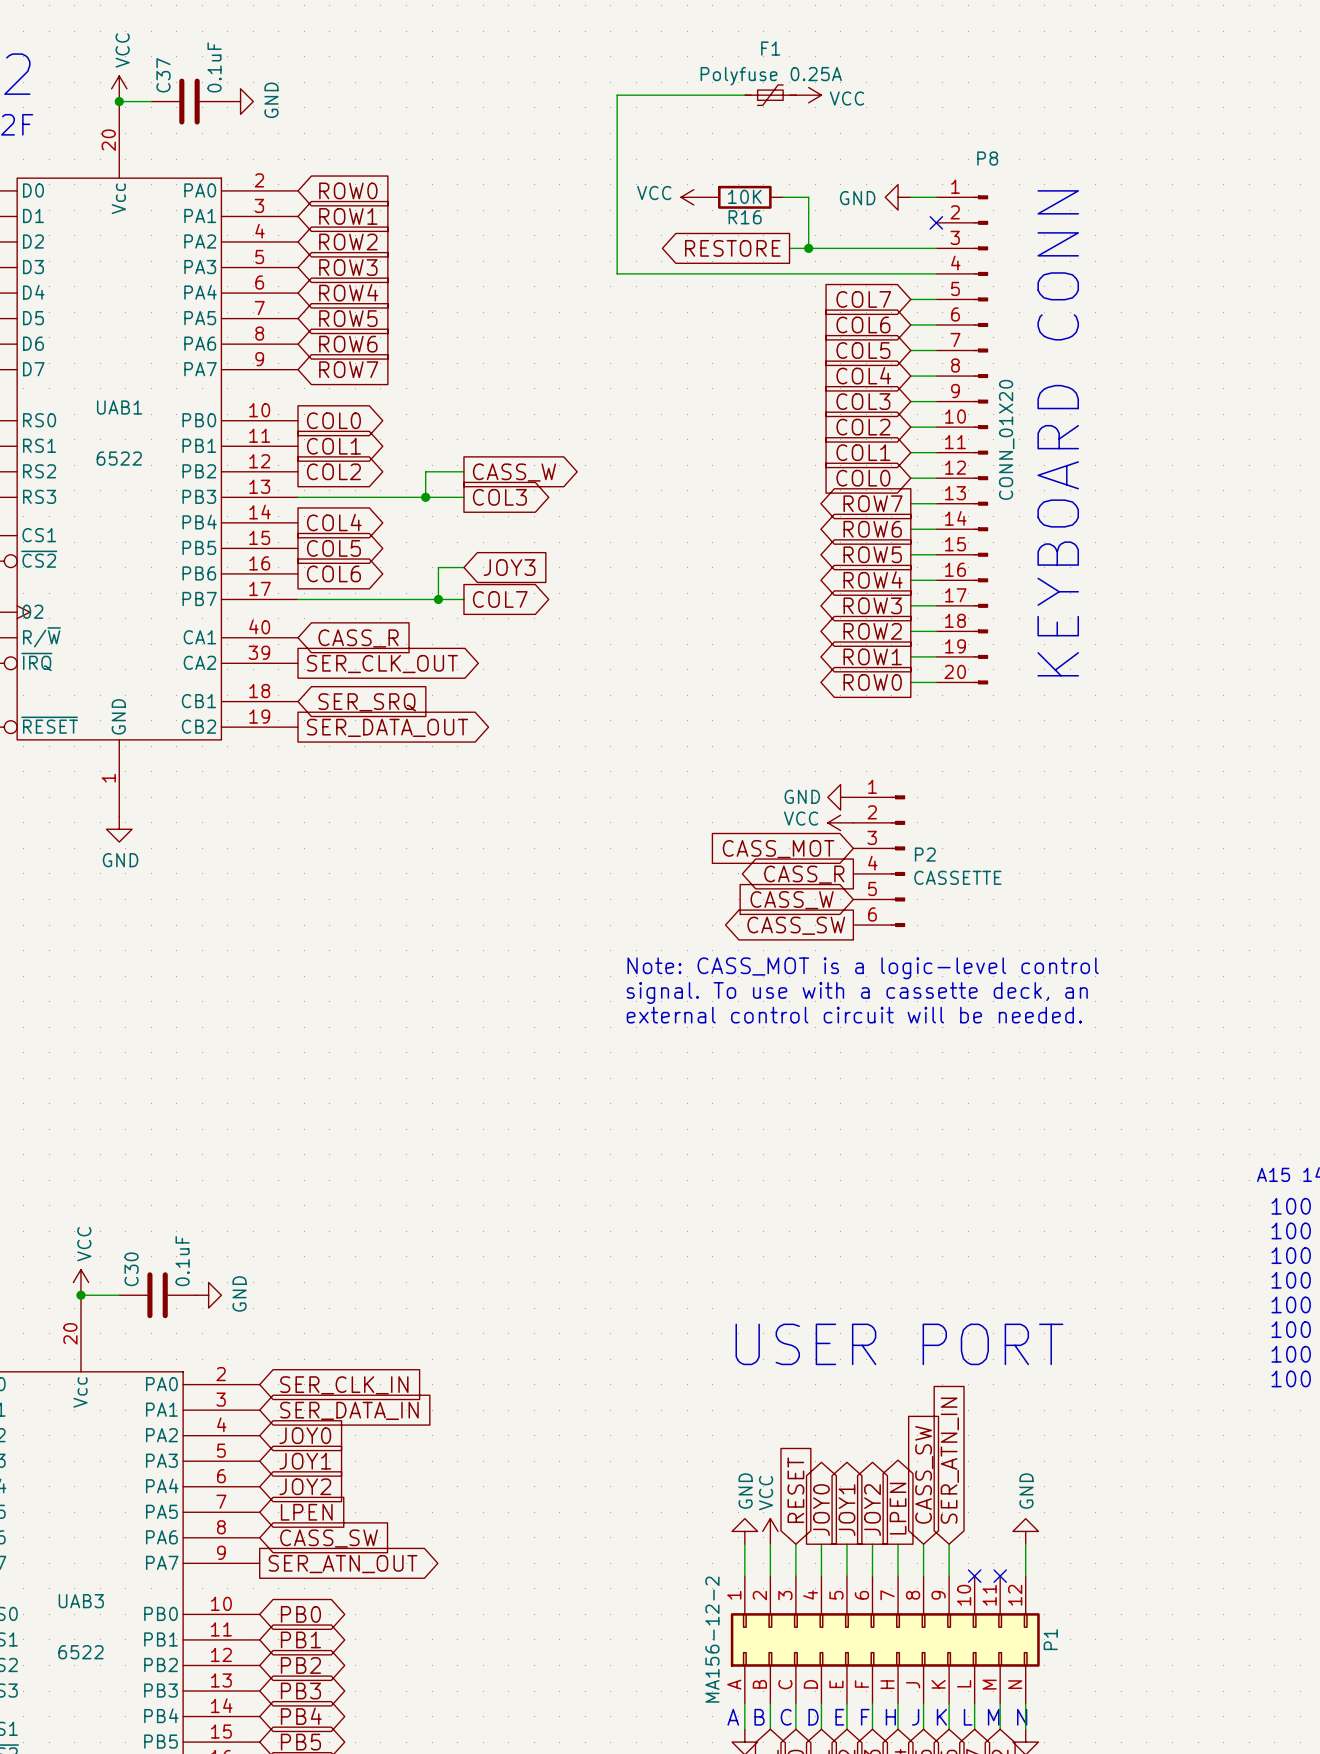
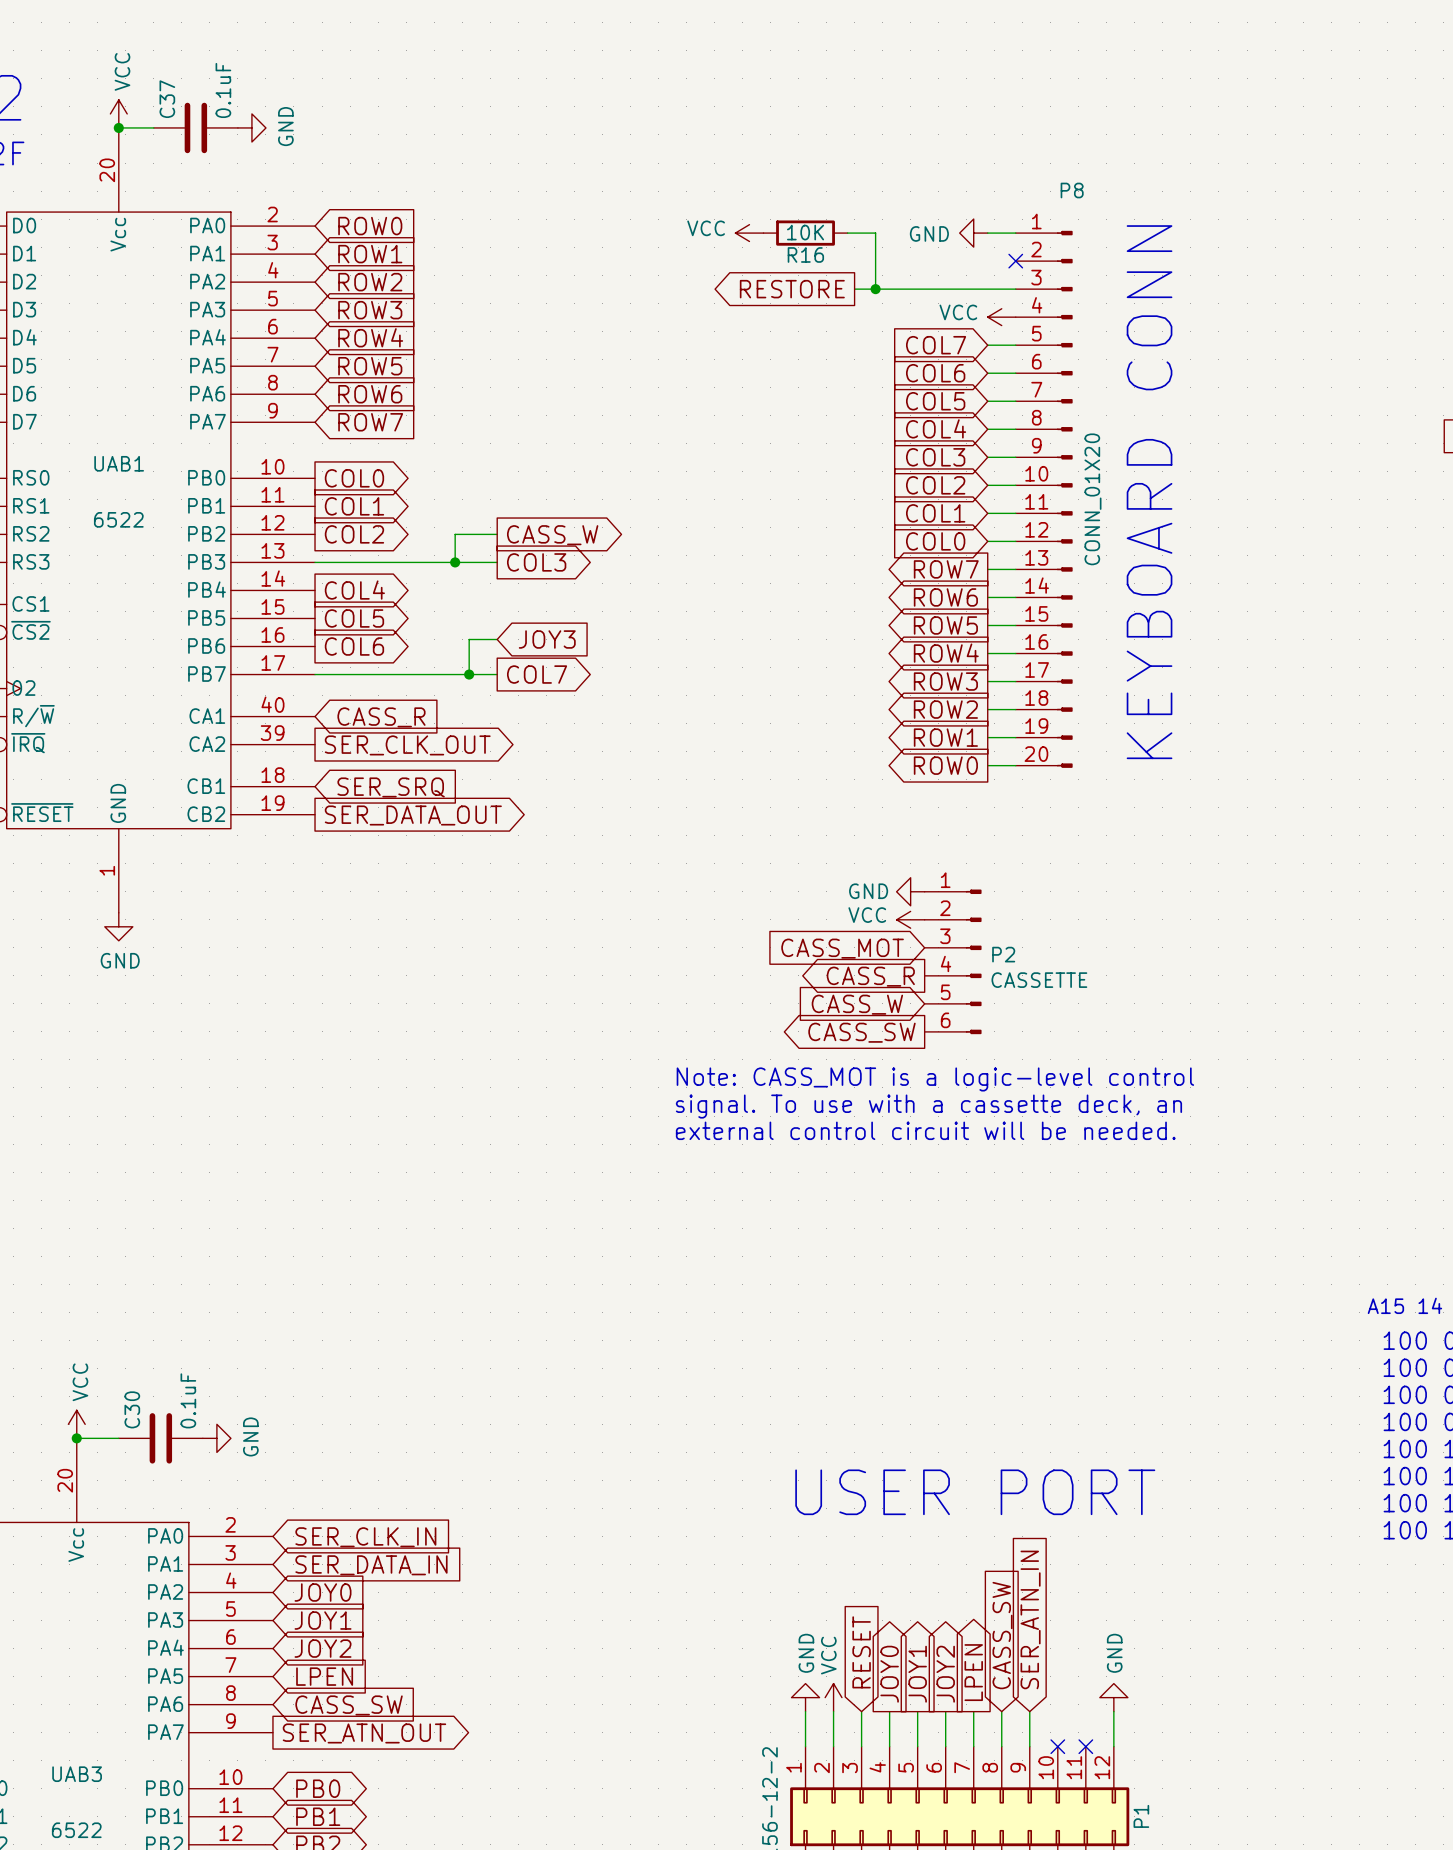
wire: (744, 95) (617, 95) (617, 273) (936, 273) -> none
F1: Polyfuse 0.25A (770, 95) -> none
power symbol rotation: 0° (808, 95) -> 180° (1001, 317)
power symbol position: VCC (808, 95) -> VCC (1001, 317)

